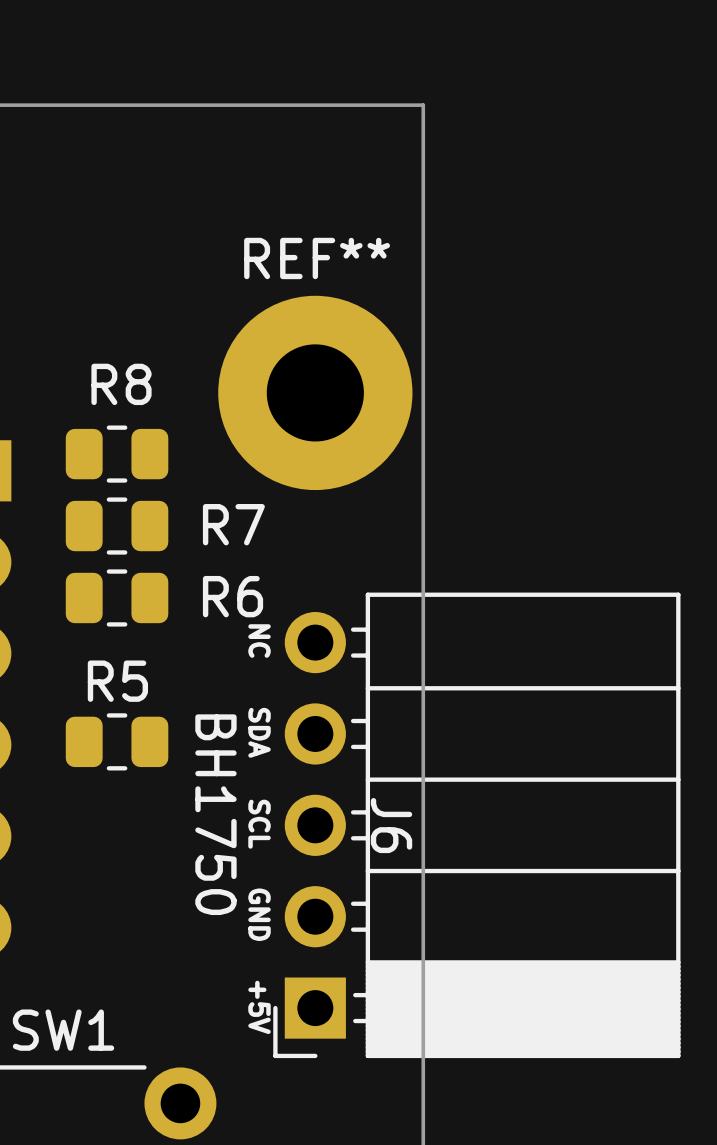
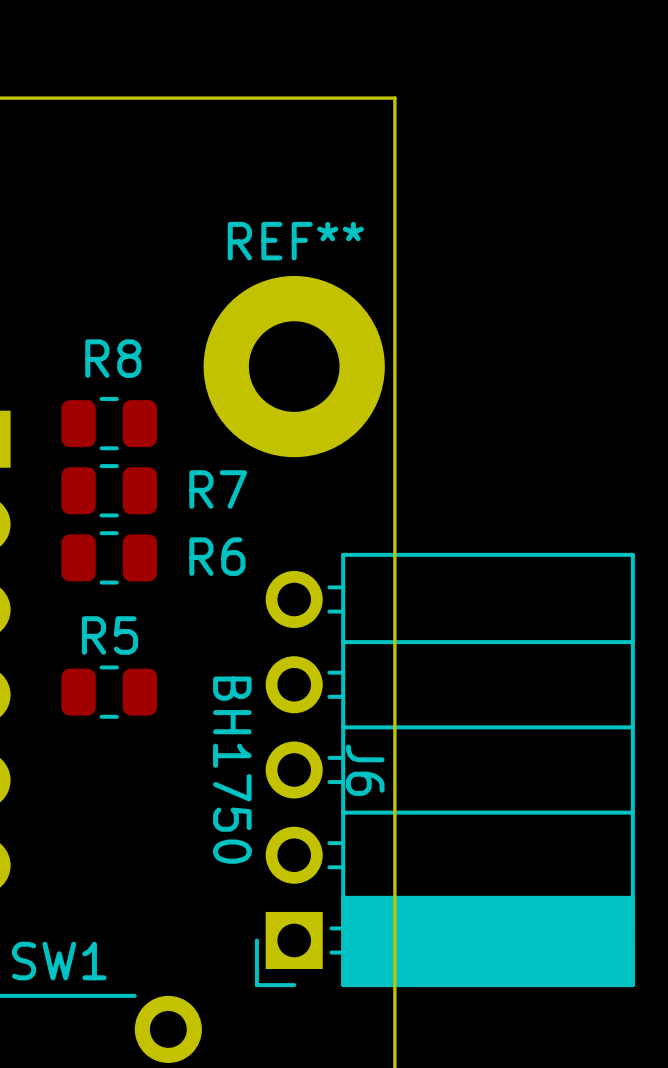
text: NC (259, 641) -> none
text: SDA (259, 732) -> none
J6 value position: BH1750 (215, 814) -> BH1750 (232, 770)
text: SCL (259, 824) -> none
text: GND (259, 914) -> none
text: +5V (259, 1007) -> none

